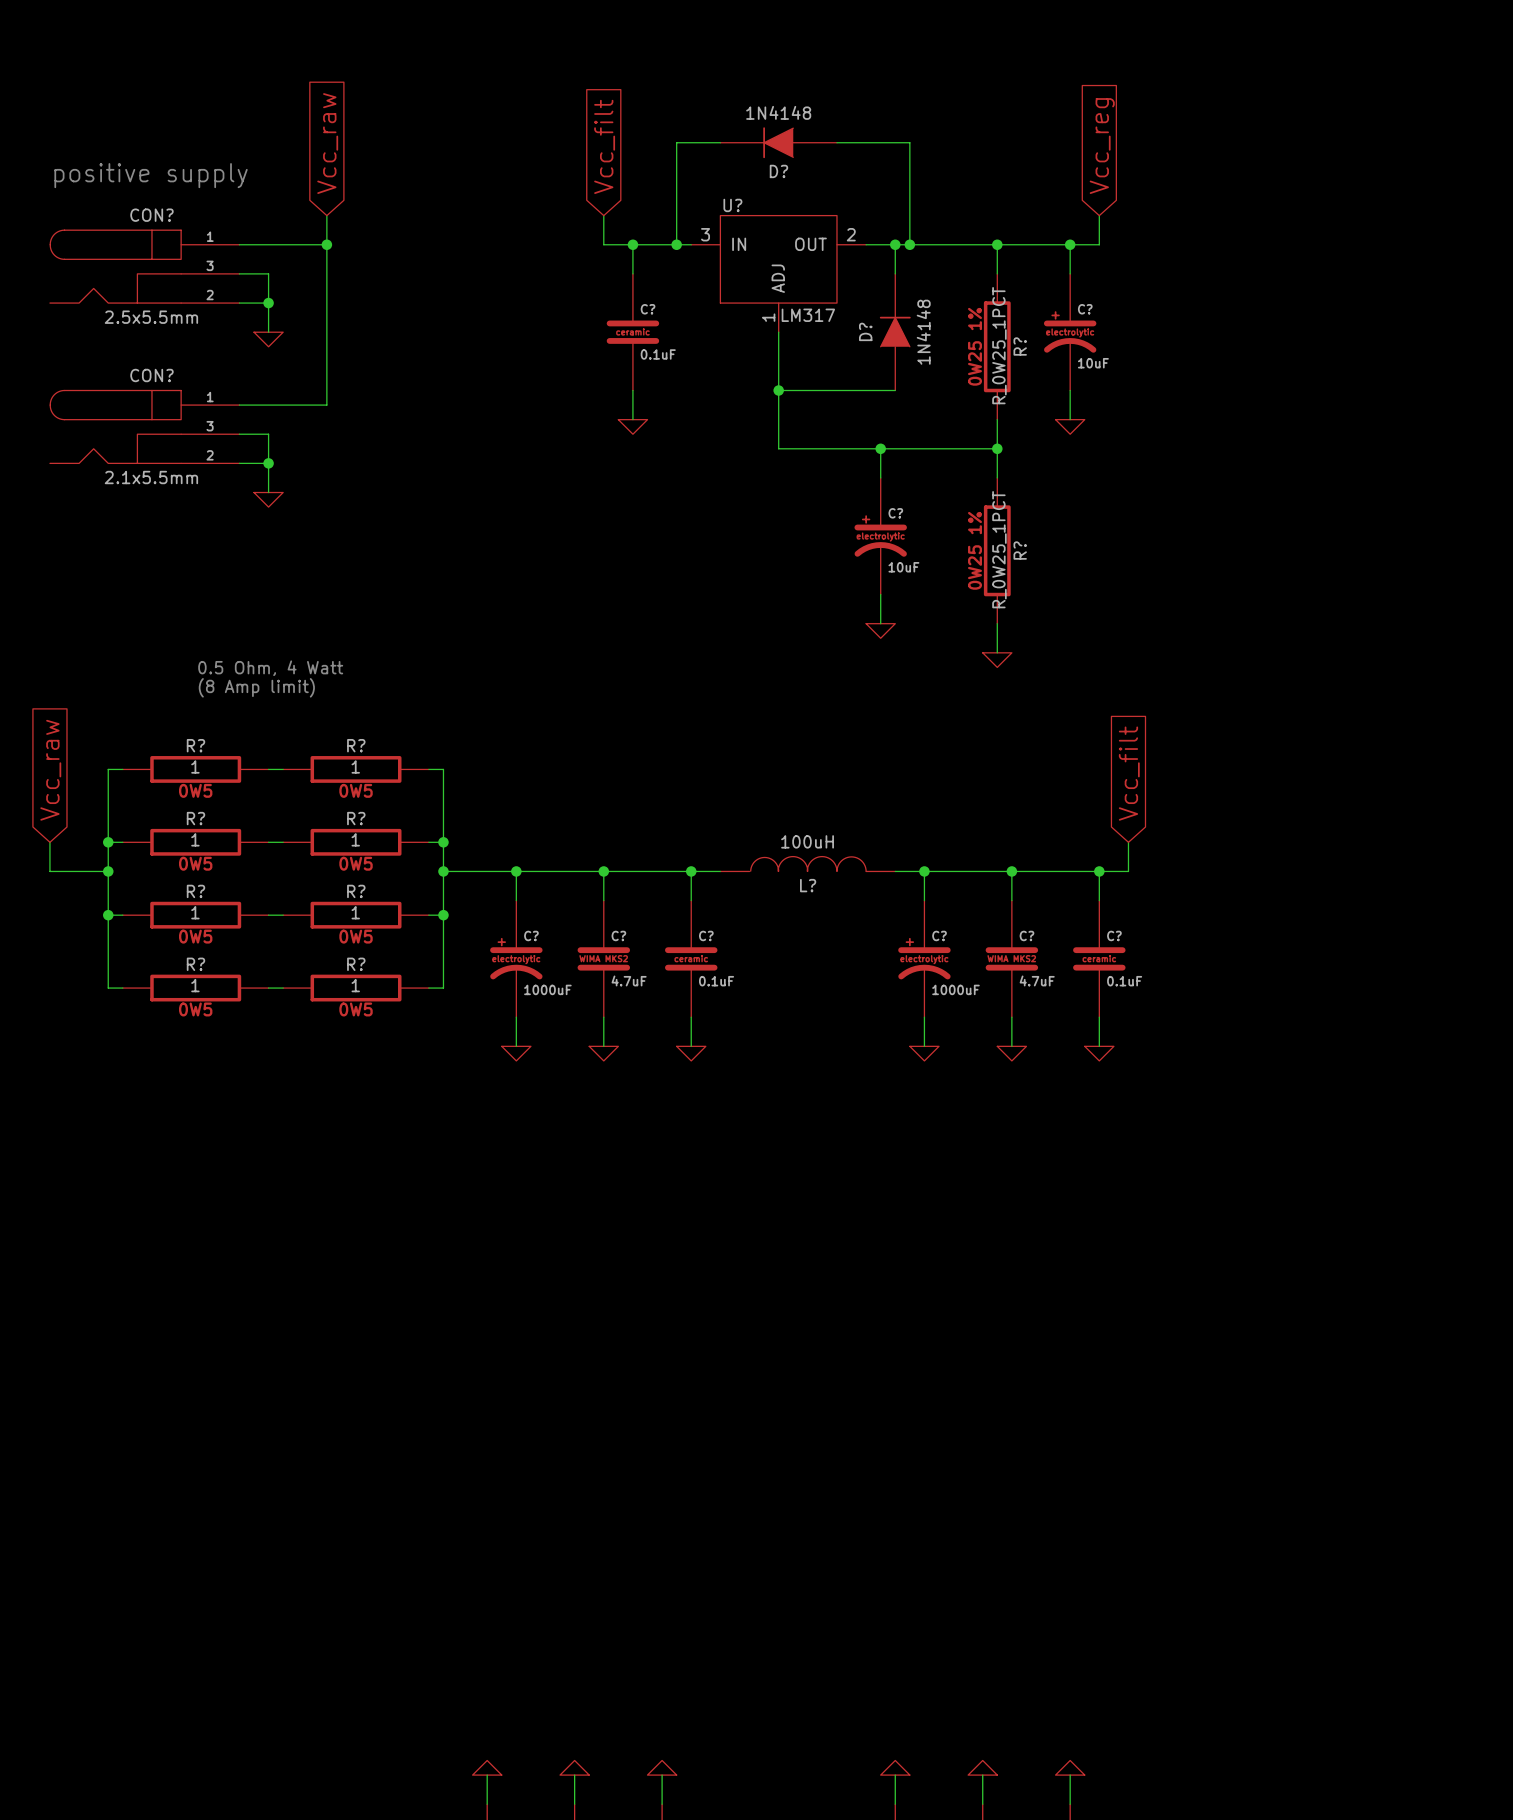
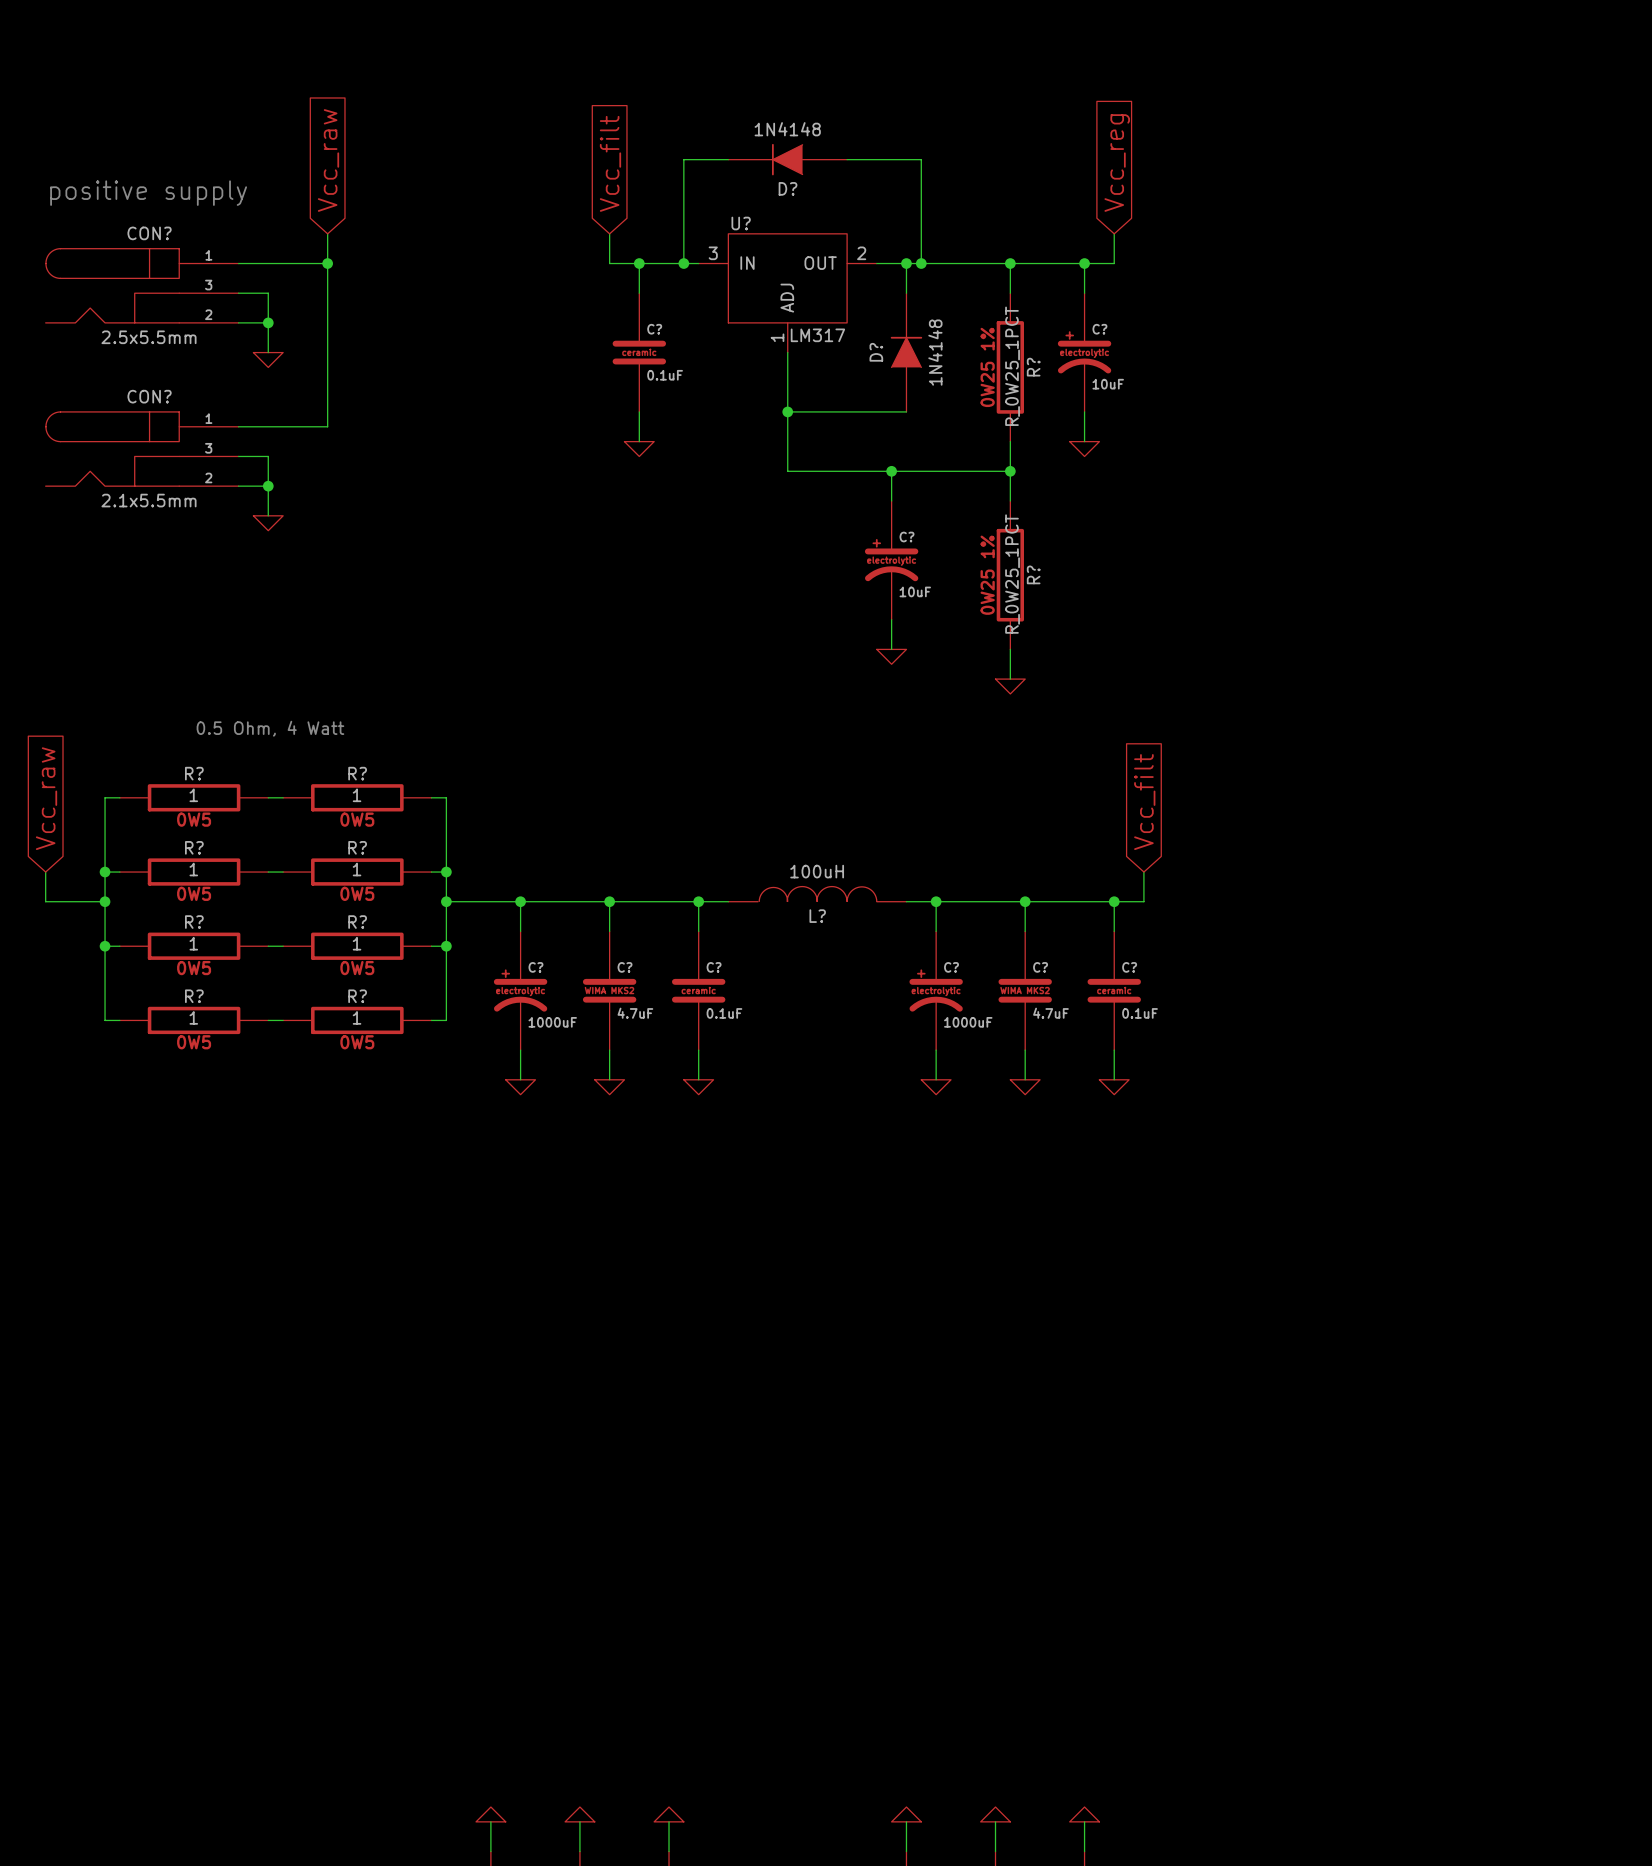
text position: 0.5 Ohm, 4 Watt (270, 668) -> 0.5 Ohm, 4 Watt (270, 728)
text: (8 Amp limit) (256, 687) -> none

